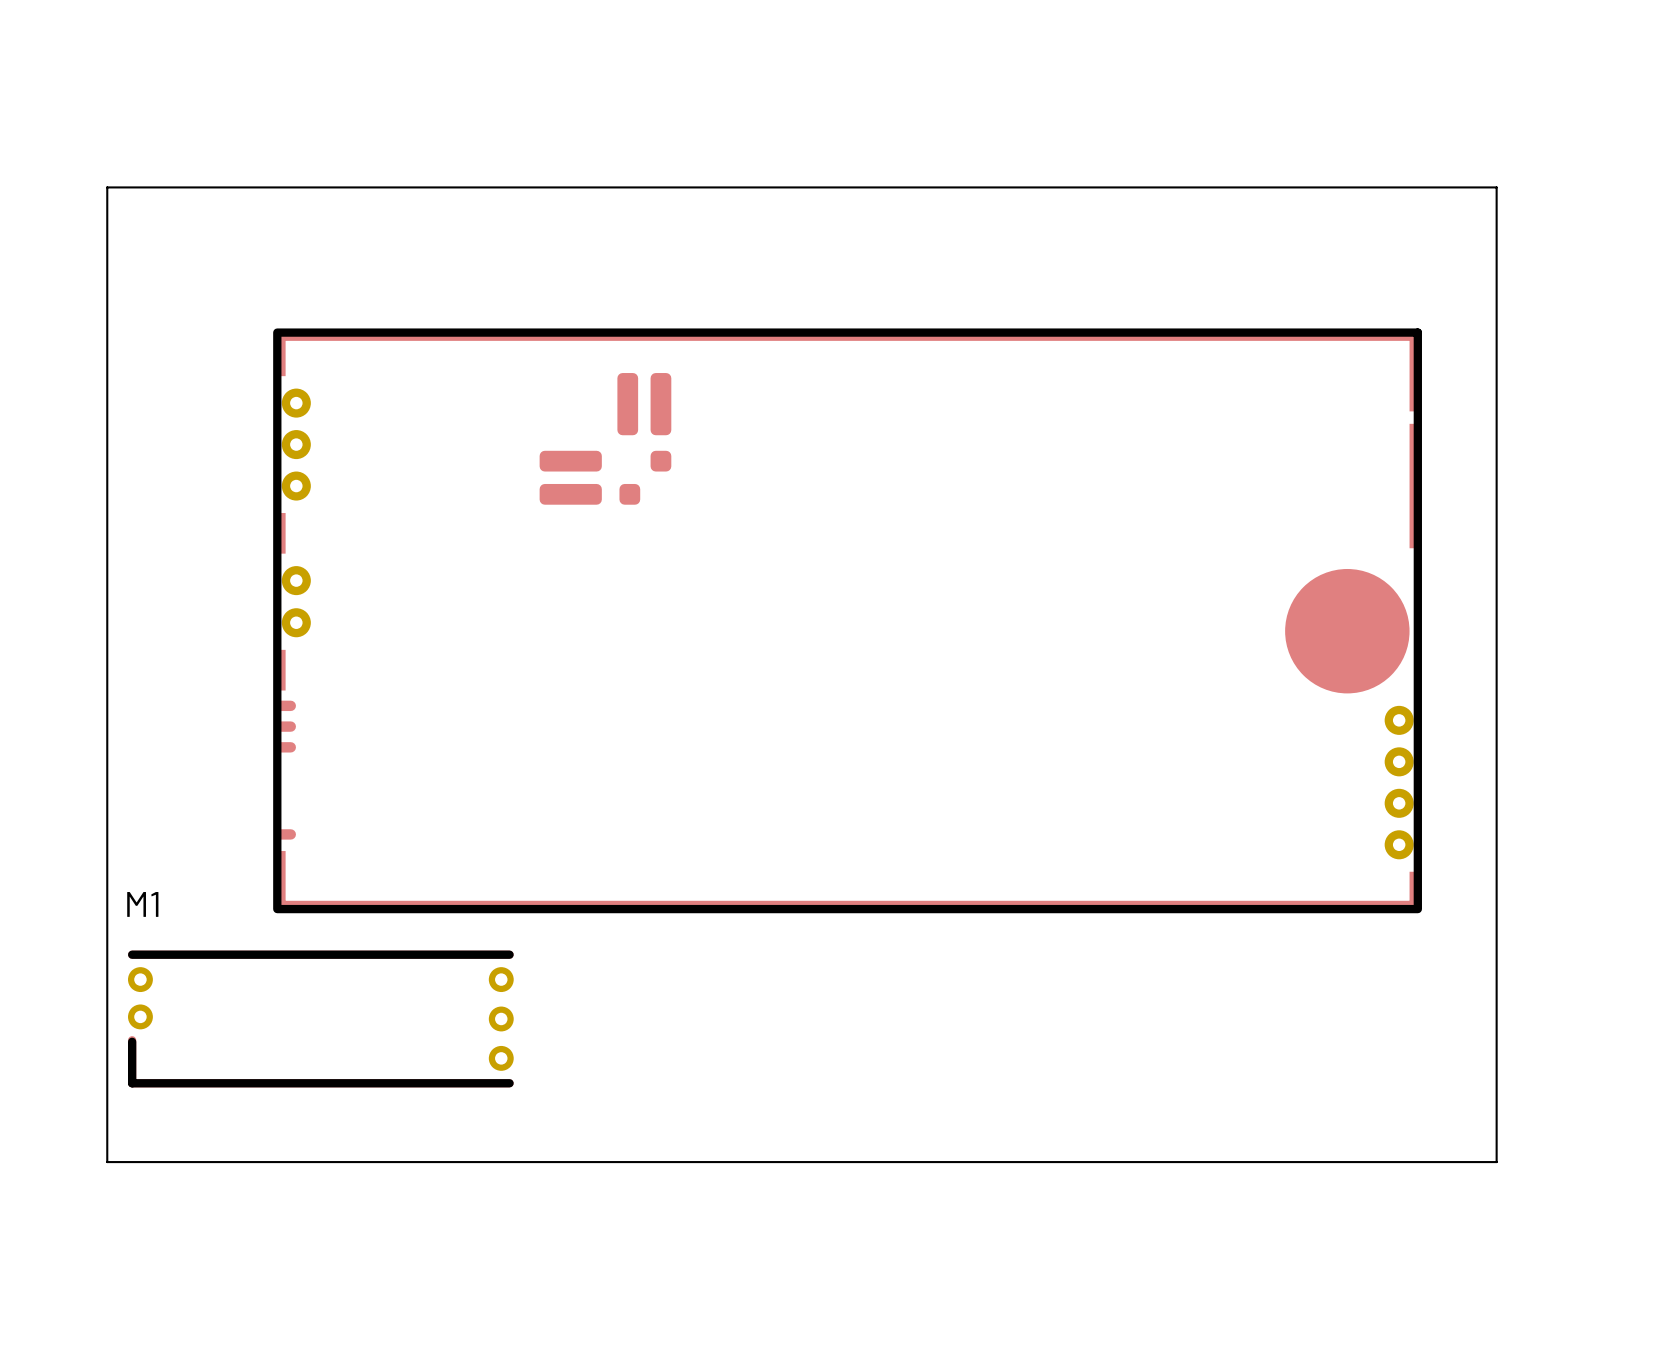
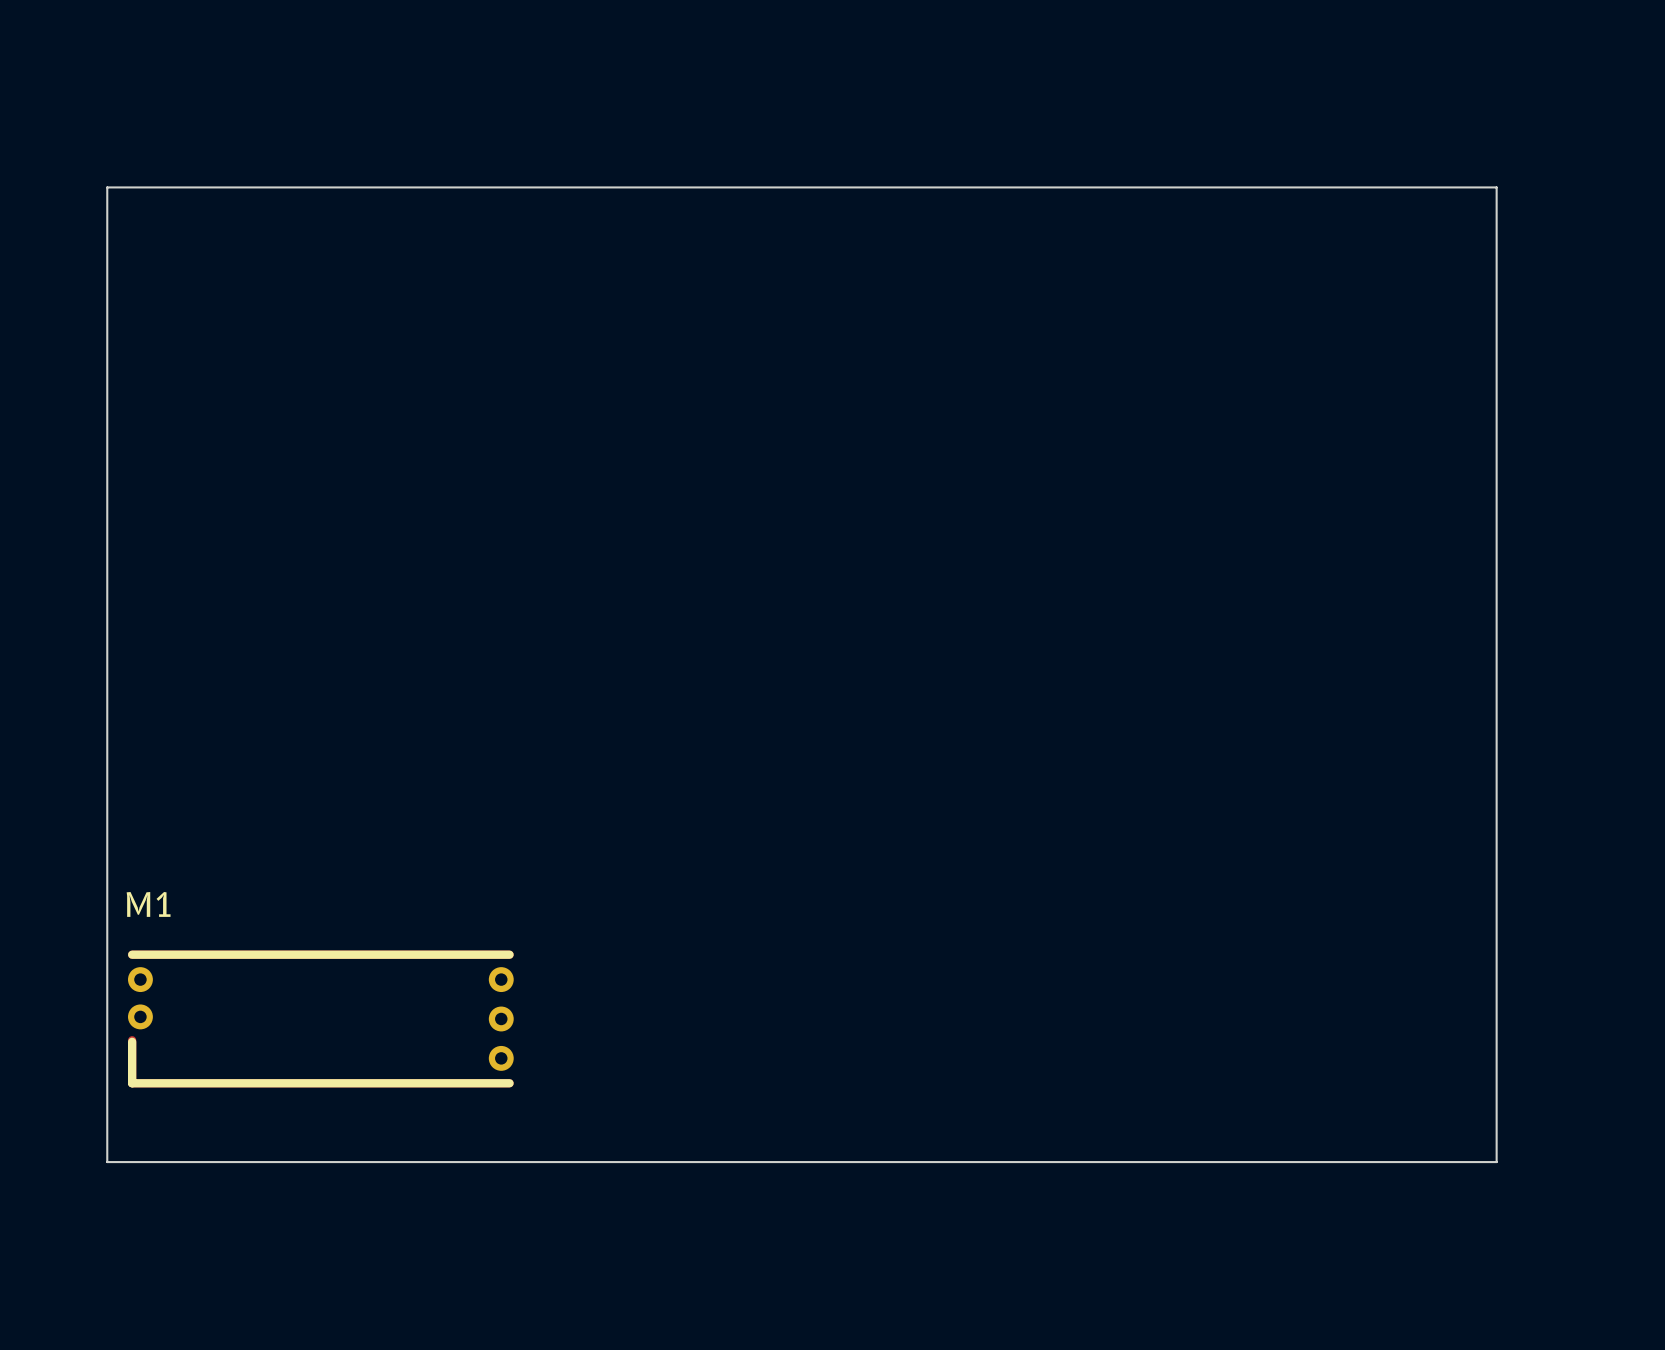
part: (847, 620) -> none

